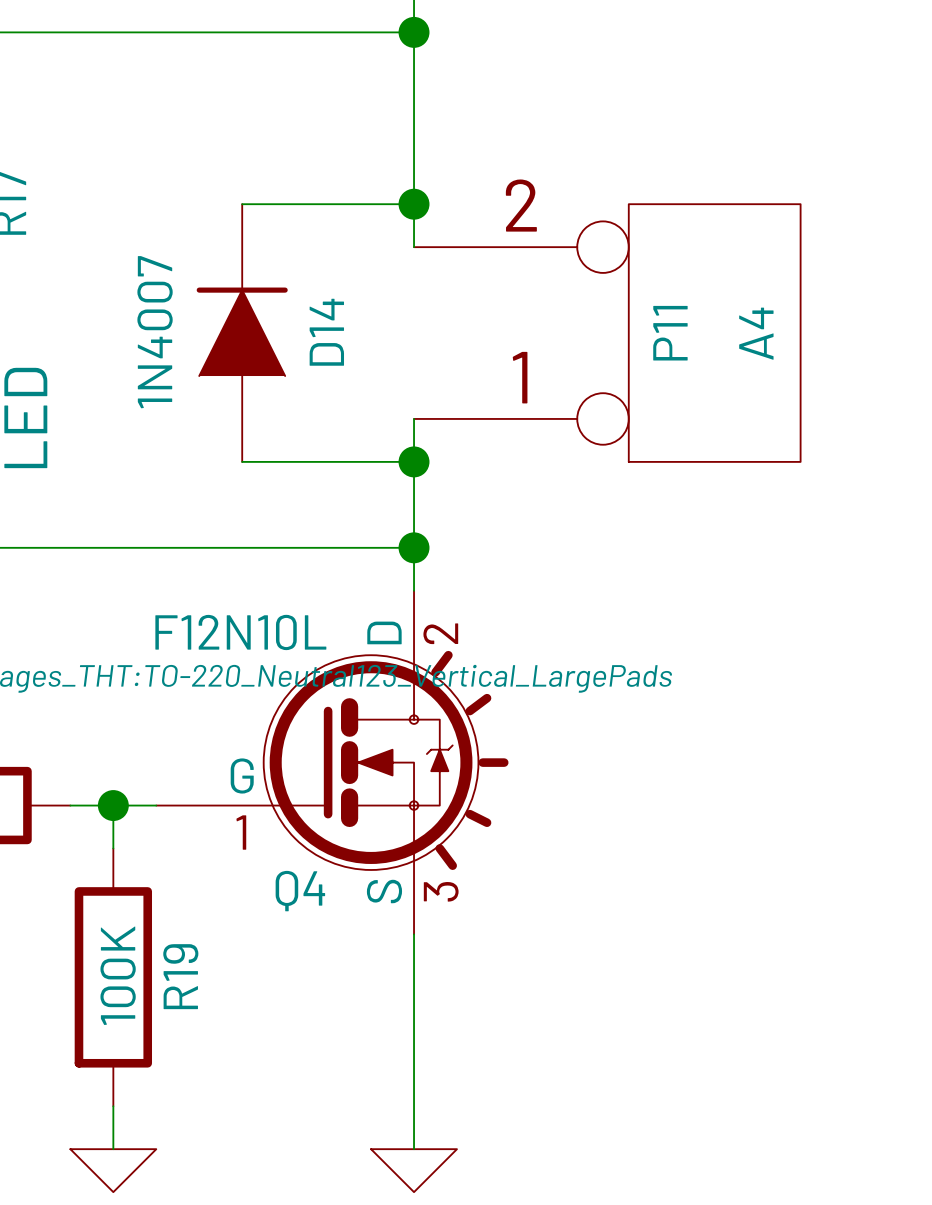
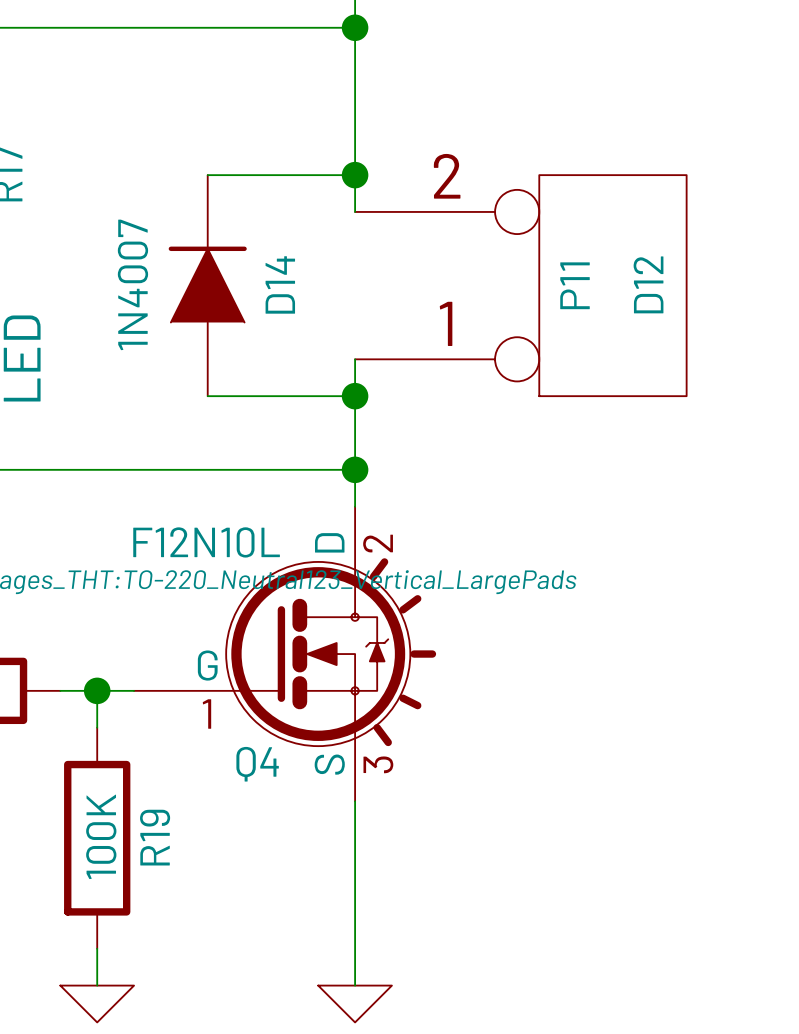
P11 value: A4 (756, 333) -> D12 (648, 284)

